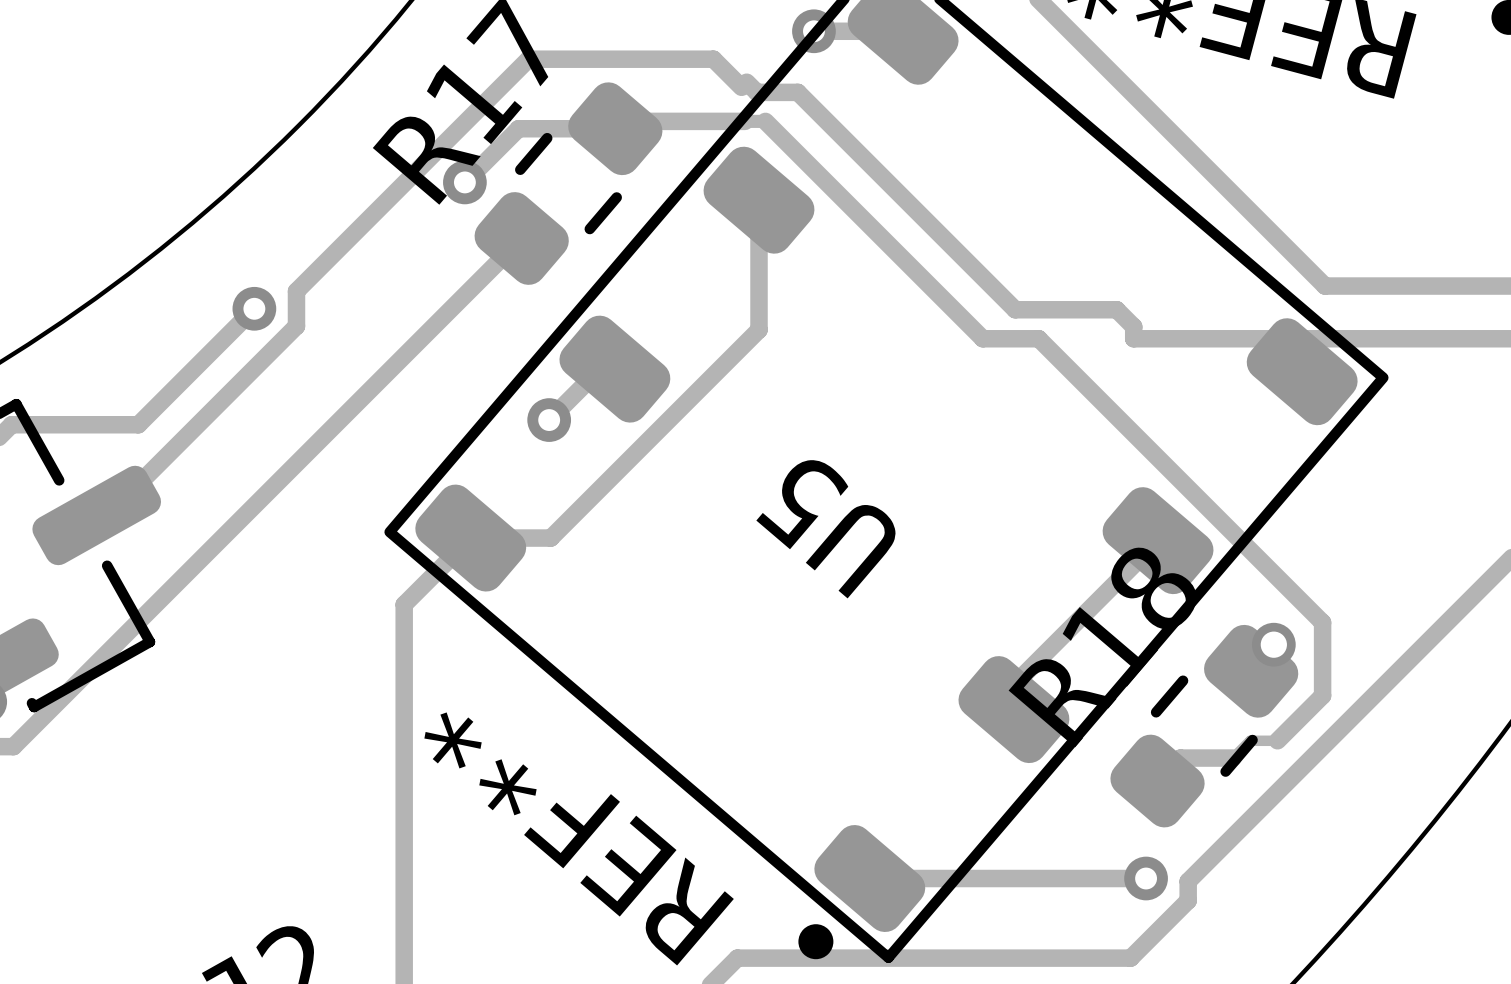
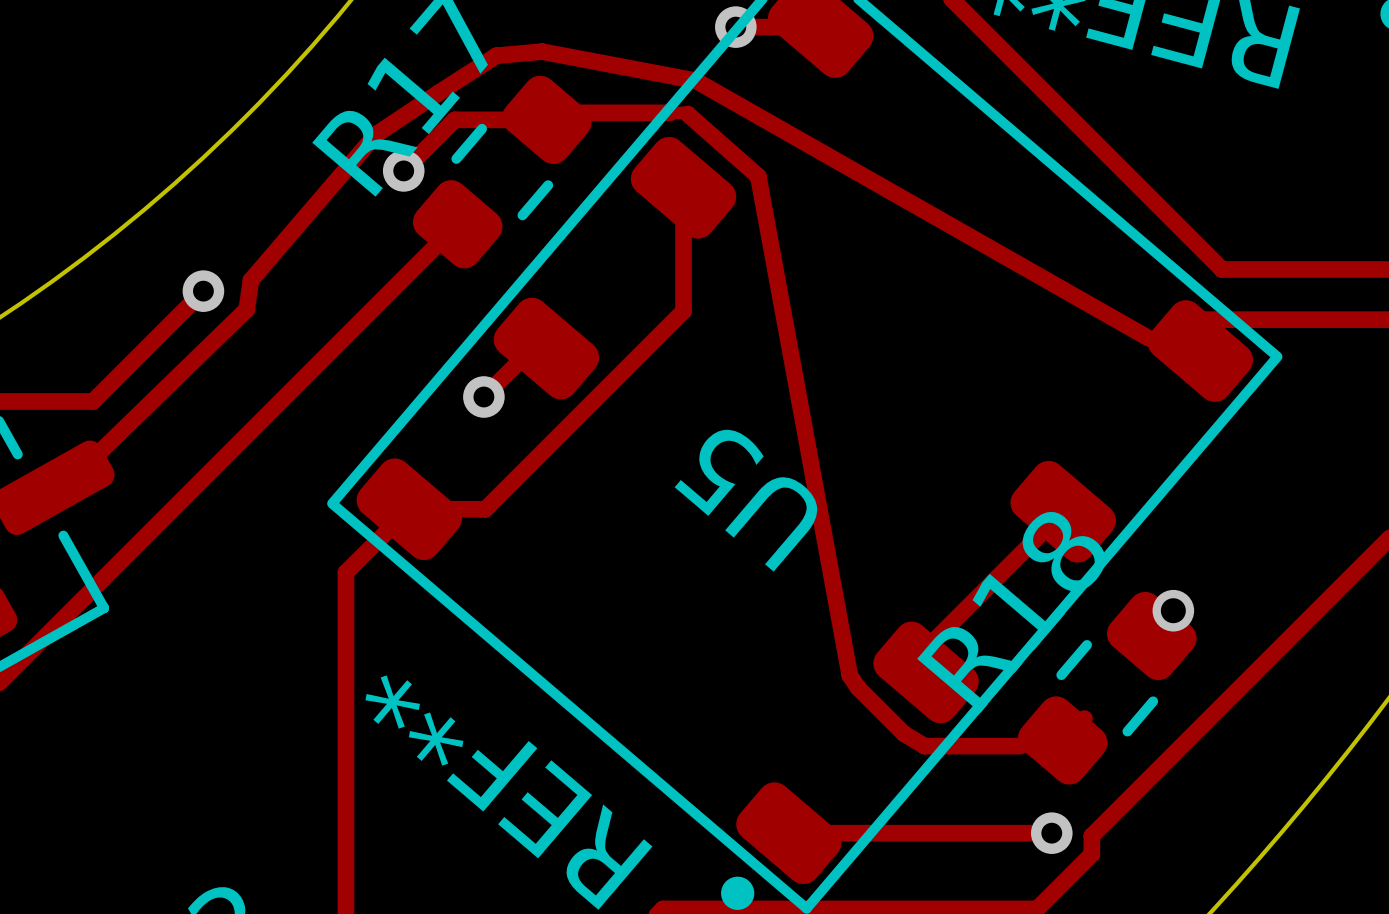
track: (765, 121) (982, 338) (1038, 338) (1322, 622) (1322, 695) (1277, 740) (1250, 740) (1233, 758) (1180, 758) -> (687, 113) (758, 176) (849, 675) (858, 687) (903, 733) (924, 746) (1020, 746)
track: (1302, 338) (1133, 338) (1133, 326) (1116, 309) (1015, 309) (797, 92) (756, 92) (746, 82) (741, 87) (713, 59) (528, 59) (296, 291) (296, 326) (107, 515) -> none
track: none -> (1149, 338) (695, 80) (542, 51) (496, 55) (375, 134) (250, 280) (246, 309) (101, 450)

